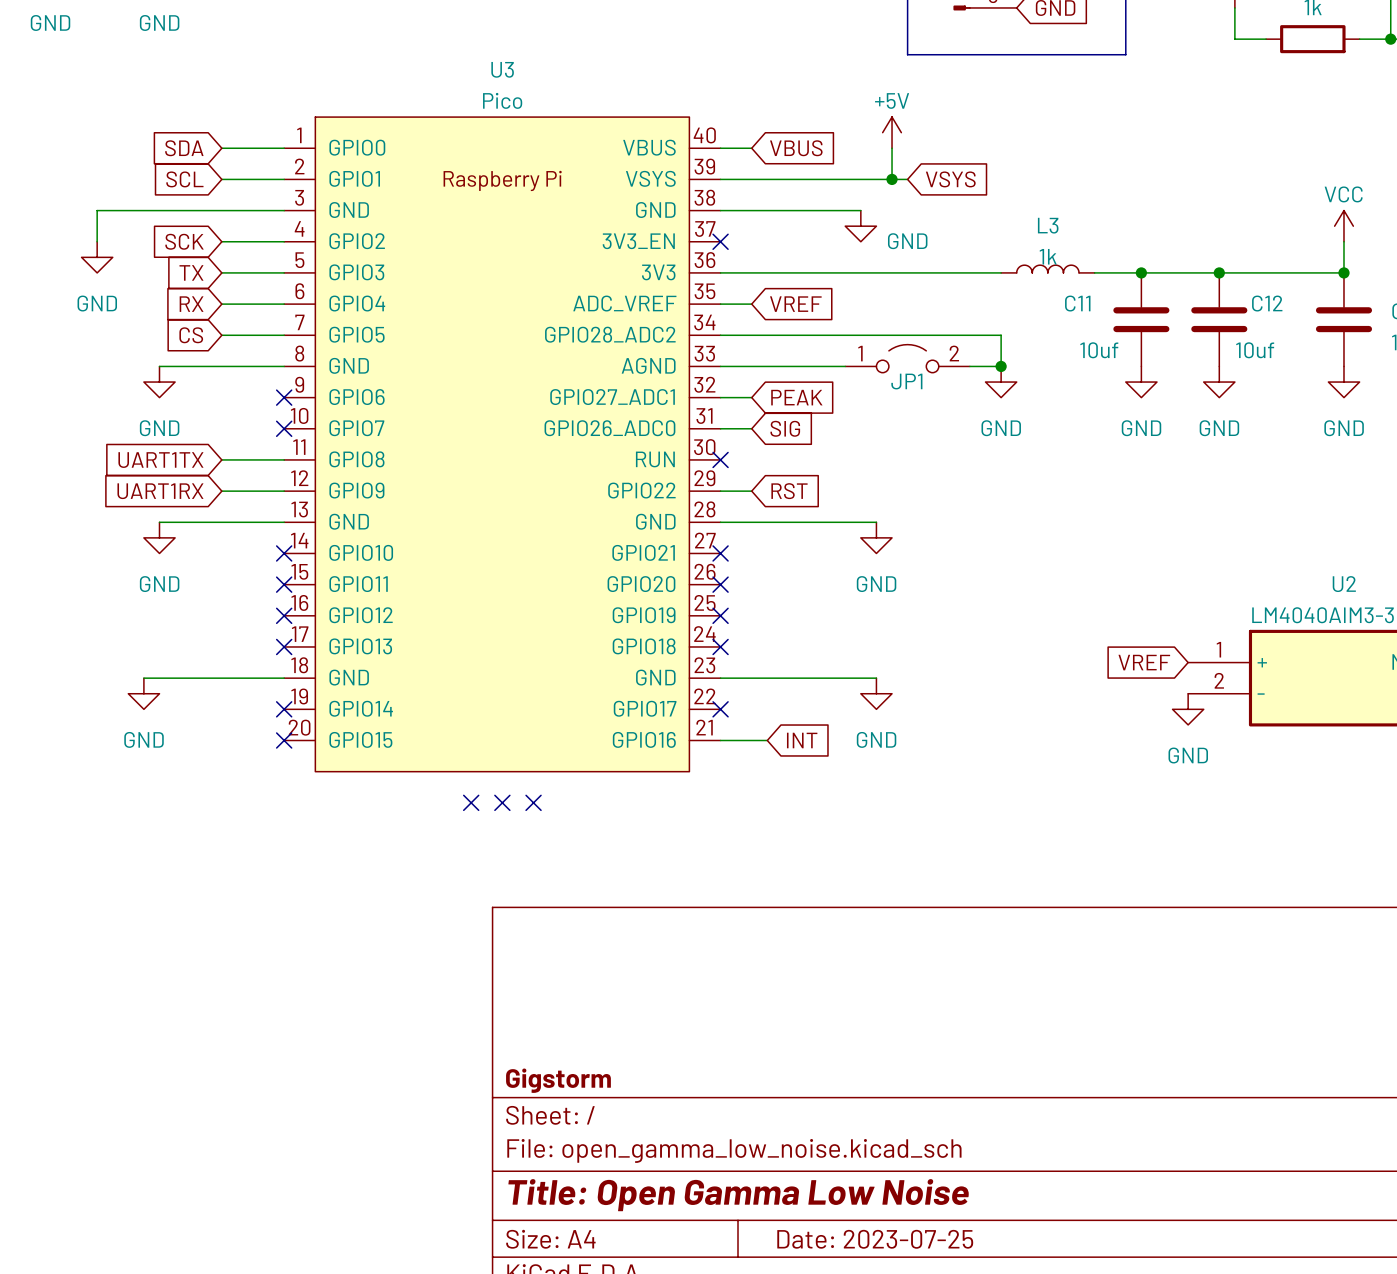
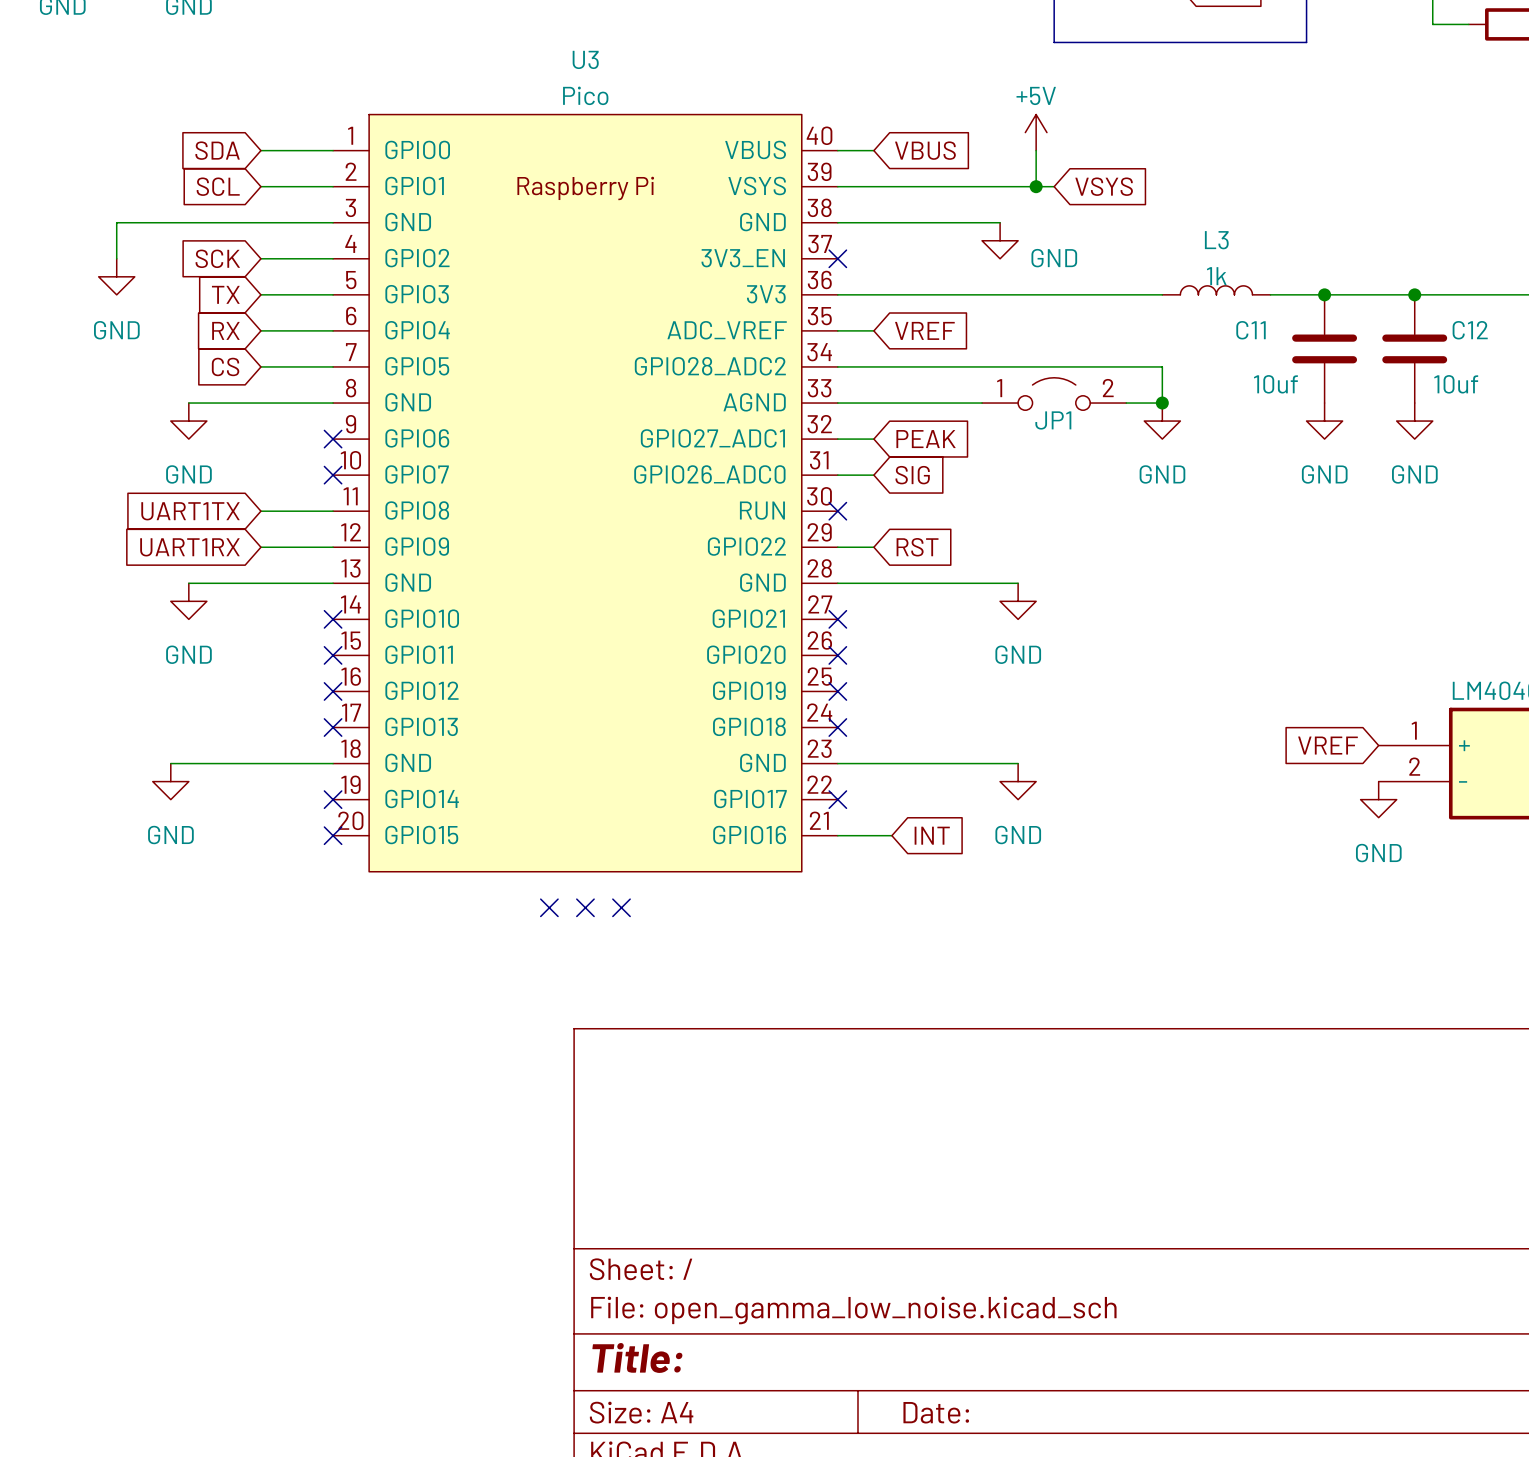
title block: Gigstorm (558, 1080) -> none
title block: Title: Open Gamma Low Noise (738, 1195) -> Title: (637, 1357)
title block: Date: 2023-07-25 (875, 1239) -> Date: (936, 1412)

